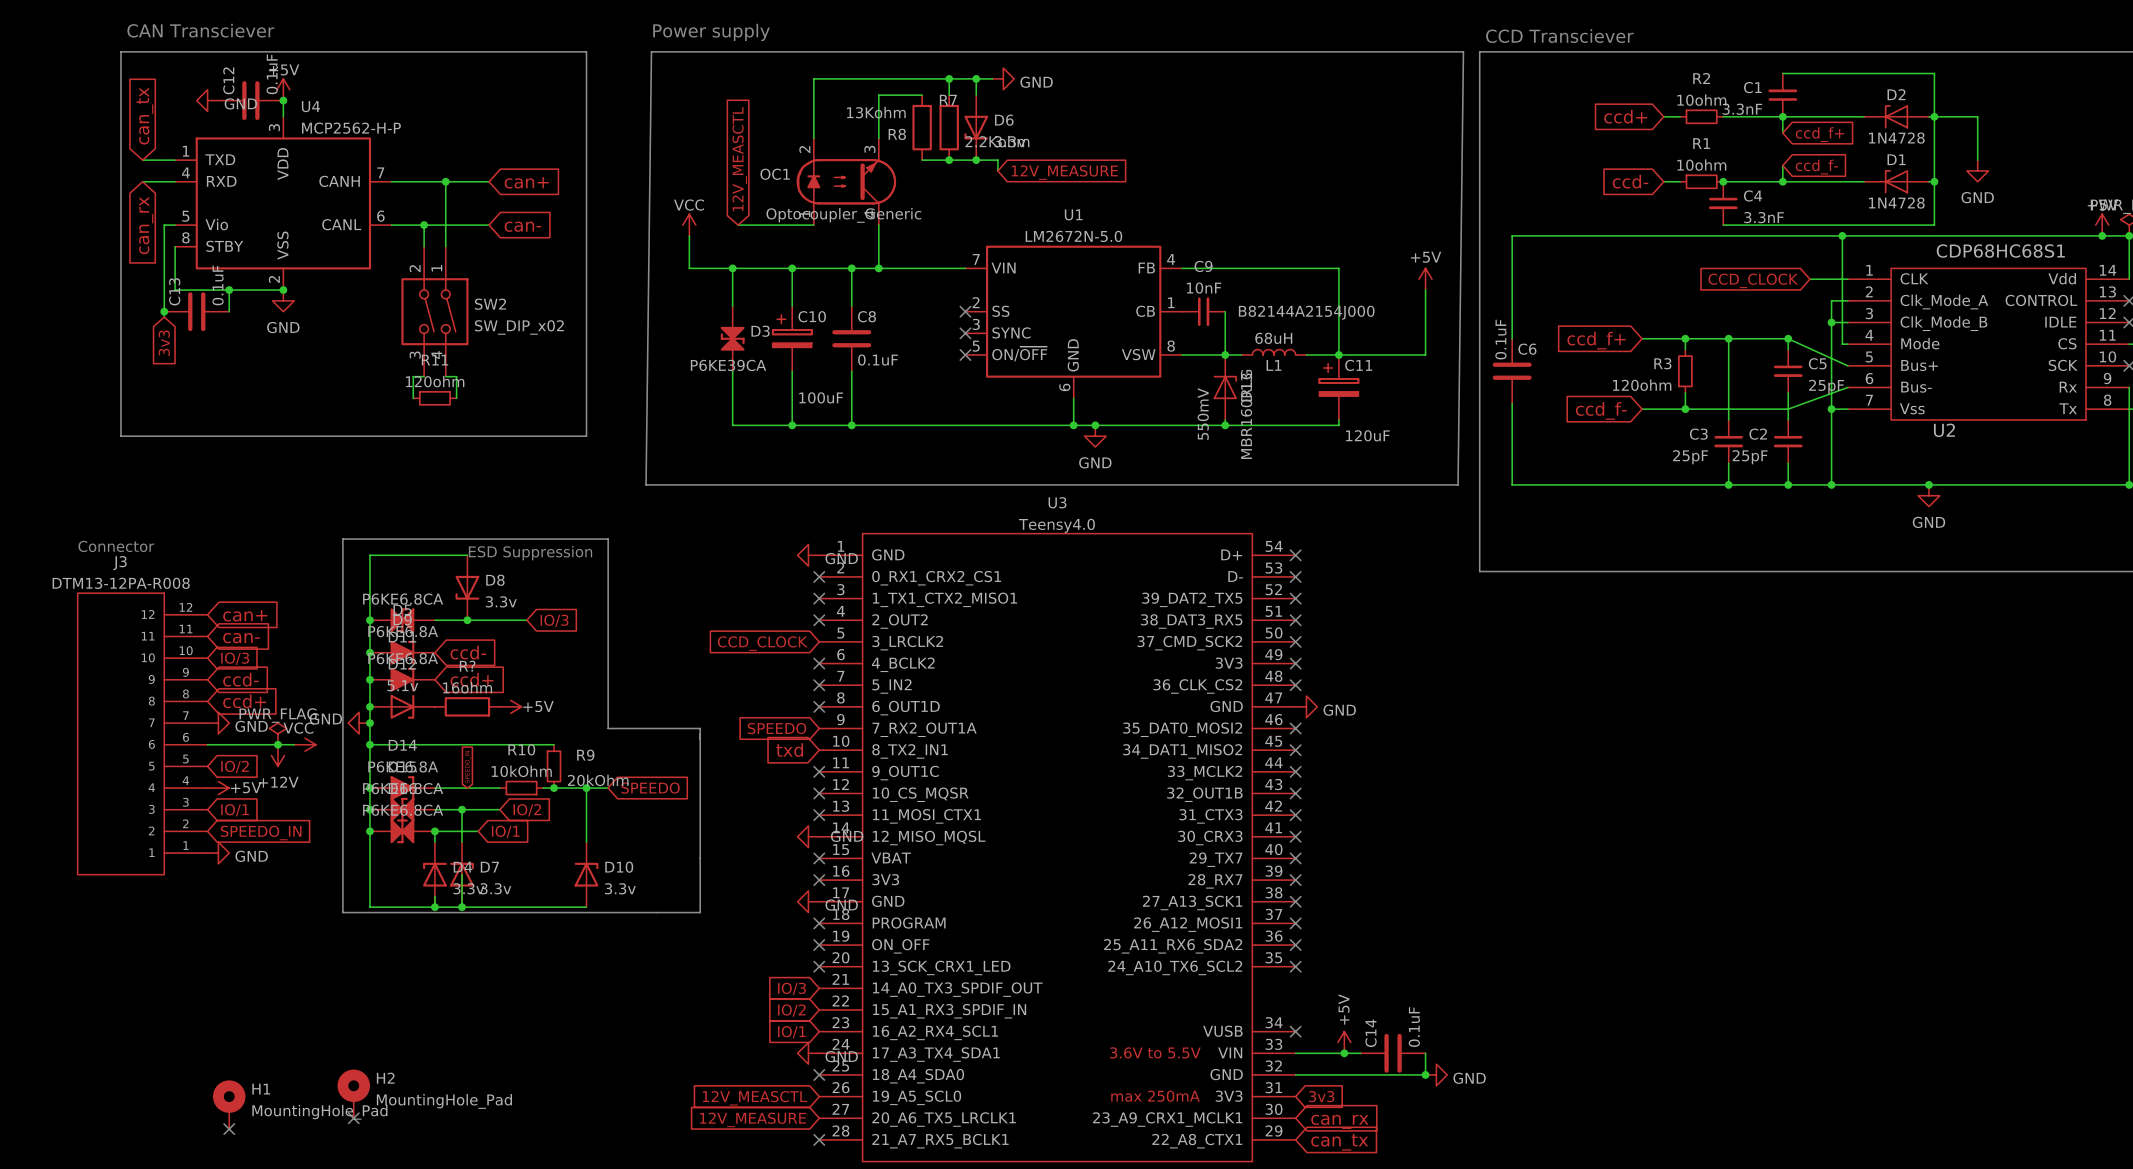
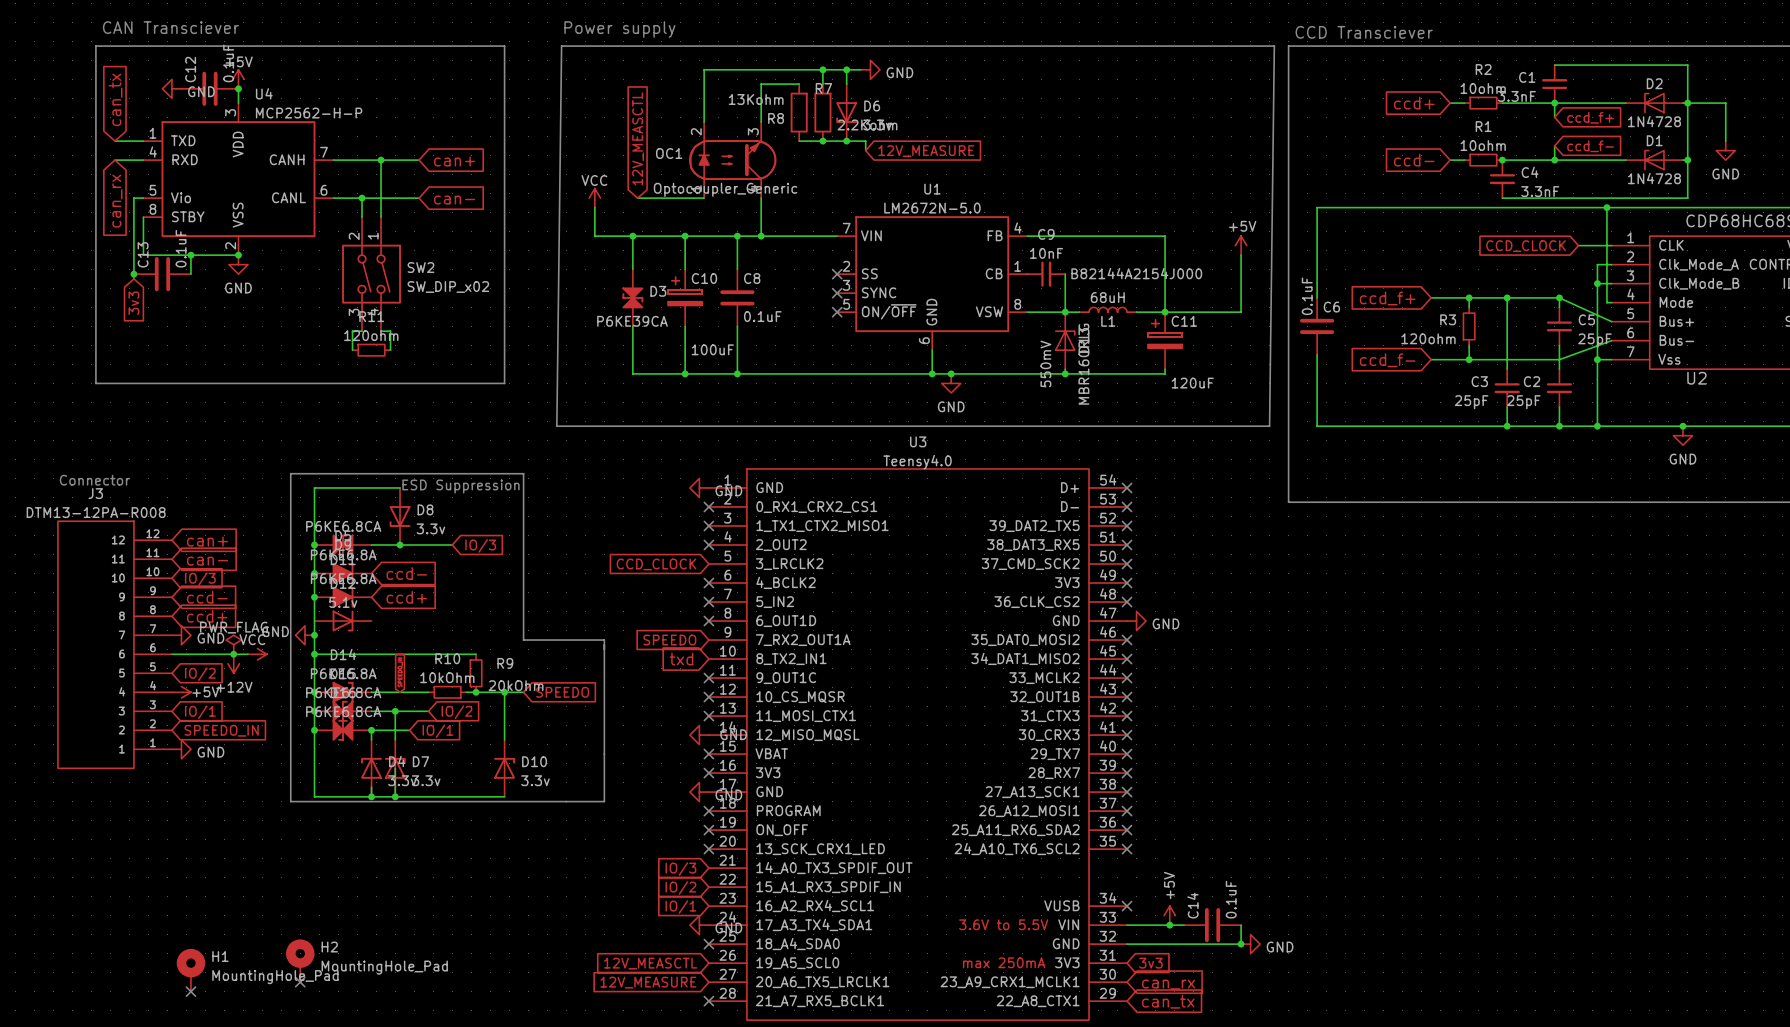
junction: (369, 706) -> none
R?: 16ohm (467, 706) -> none
power symbol: +5V (510, 706) -> none

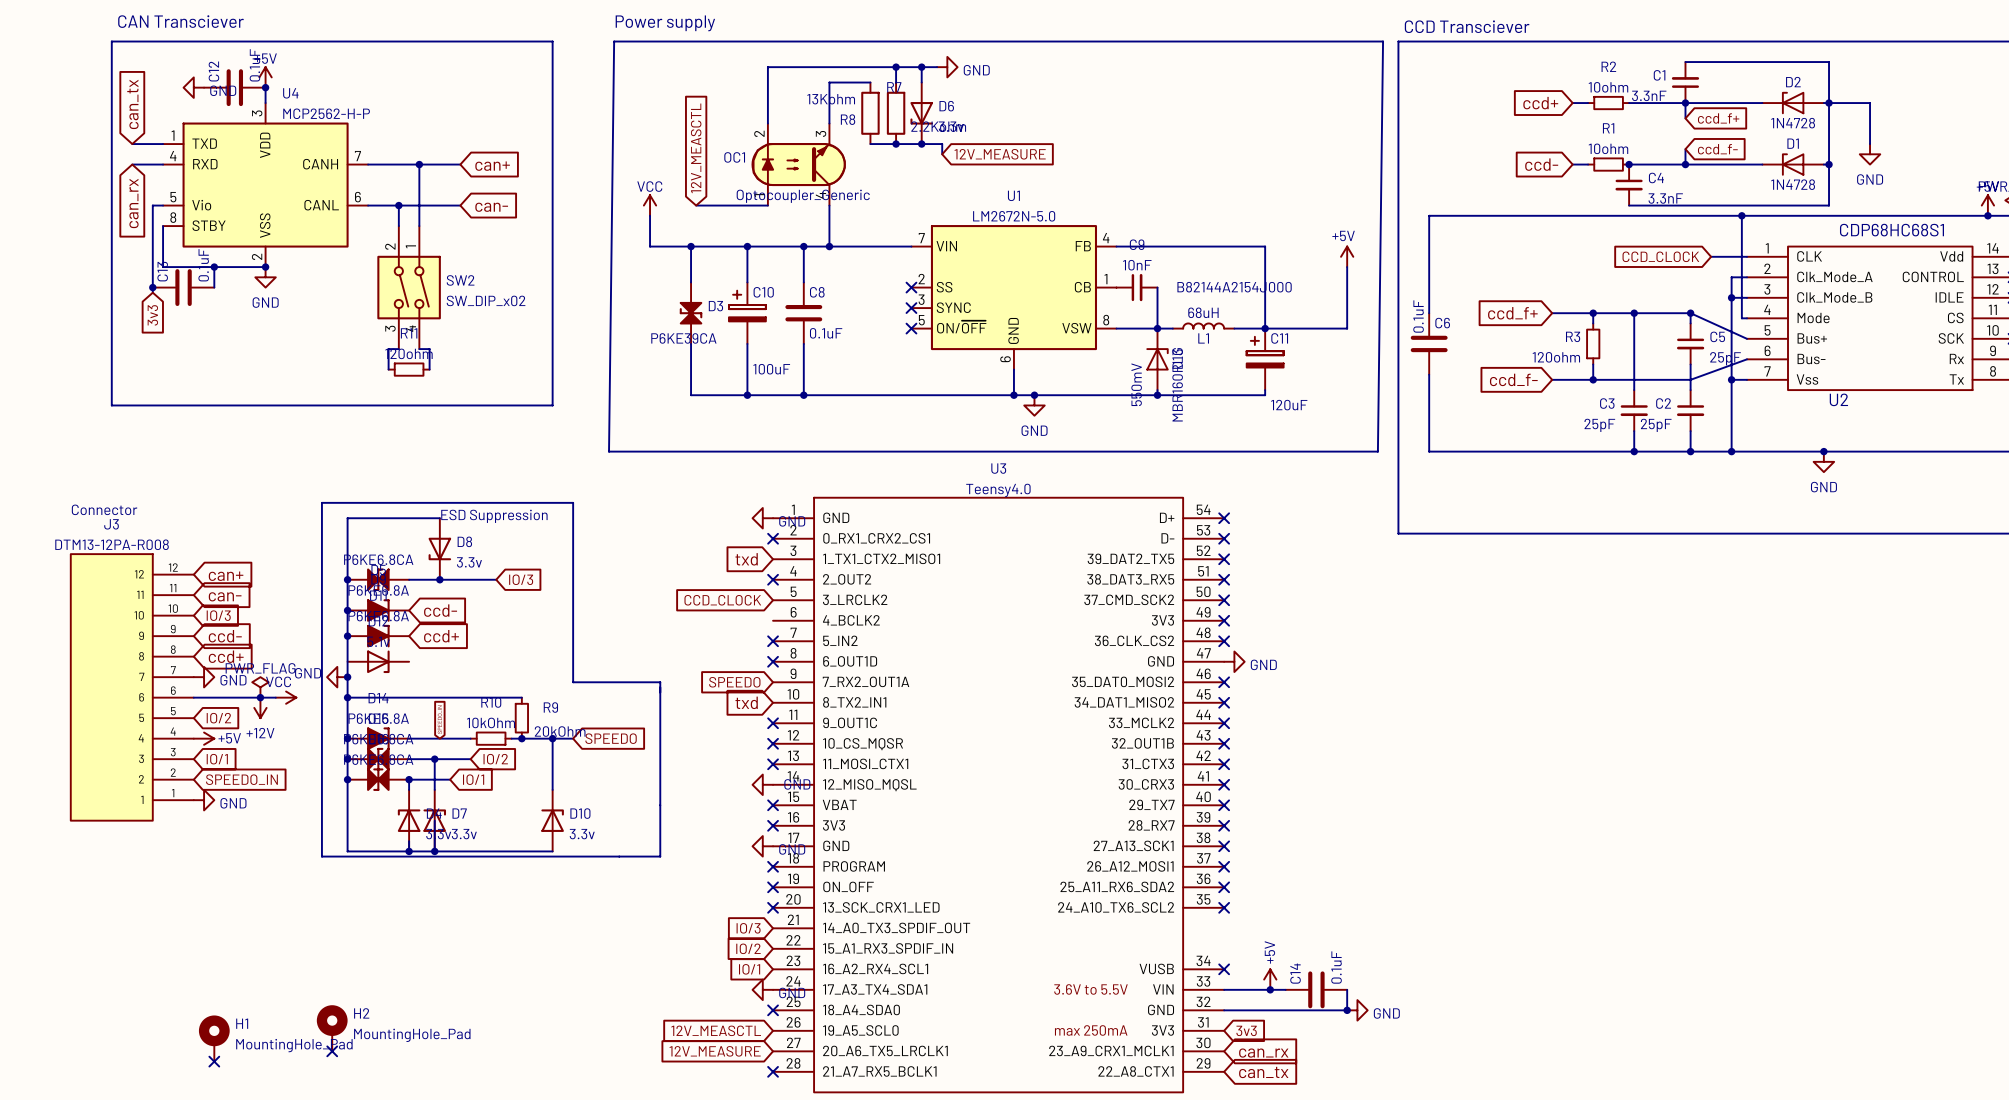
global label: none -> txd (746, 559)
no-connect mark: (708, 525) -> none
no-connect mark: (708, 583) -> none

